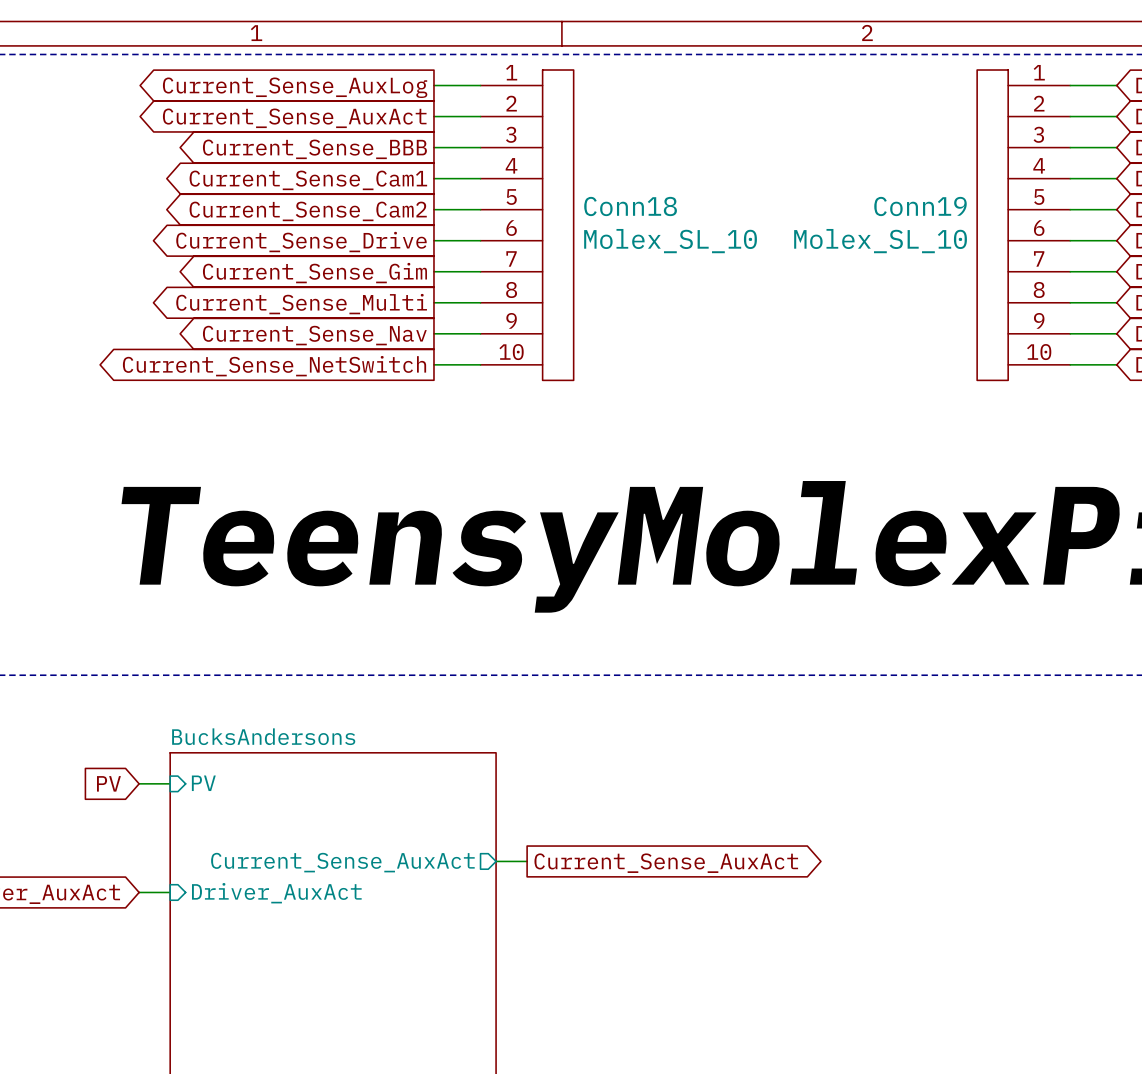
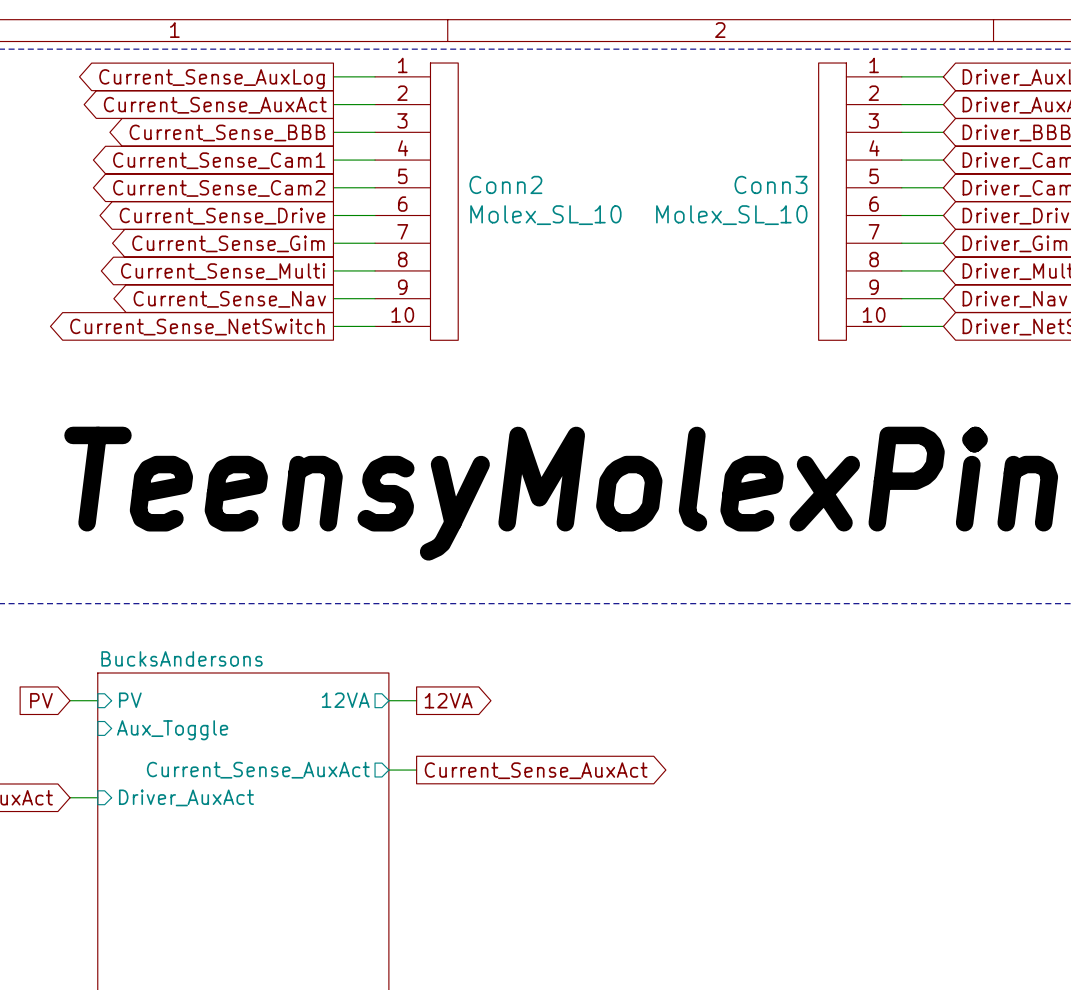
Conn18 name: Conn18 (630, 206) -> Conn2 (505, 184)
Conn19 name: Conn19 (920, 206) -> Conn3 (770, 184)
sheet pin: none -> 12VA (345, 700)
wire: none -> (388, 700) (416, 700)
global label: none -> 12VA (448, 700)
sheet pin: none -> Aux_Toggle (172, 730)

